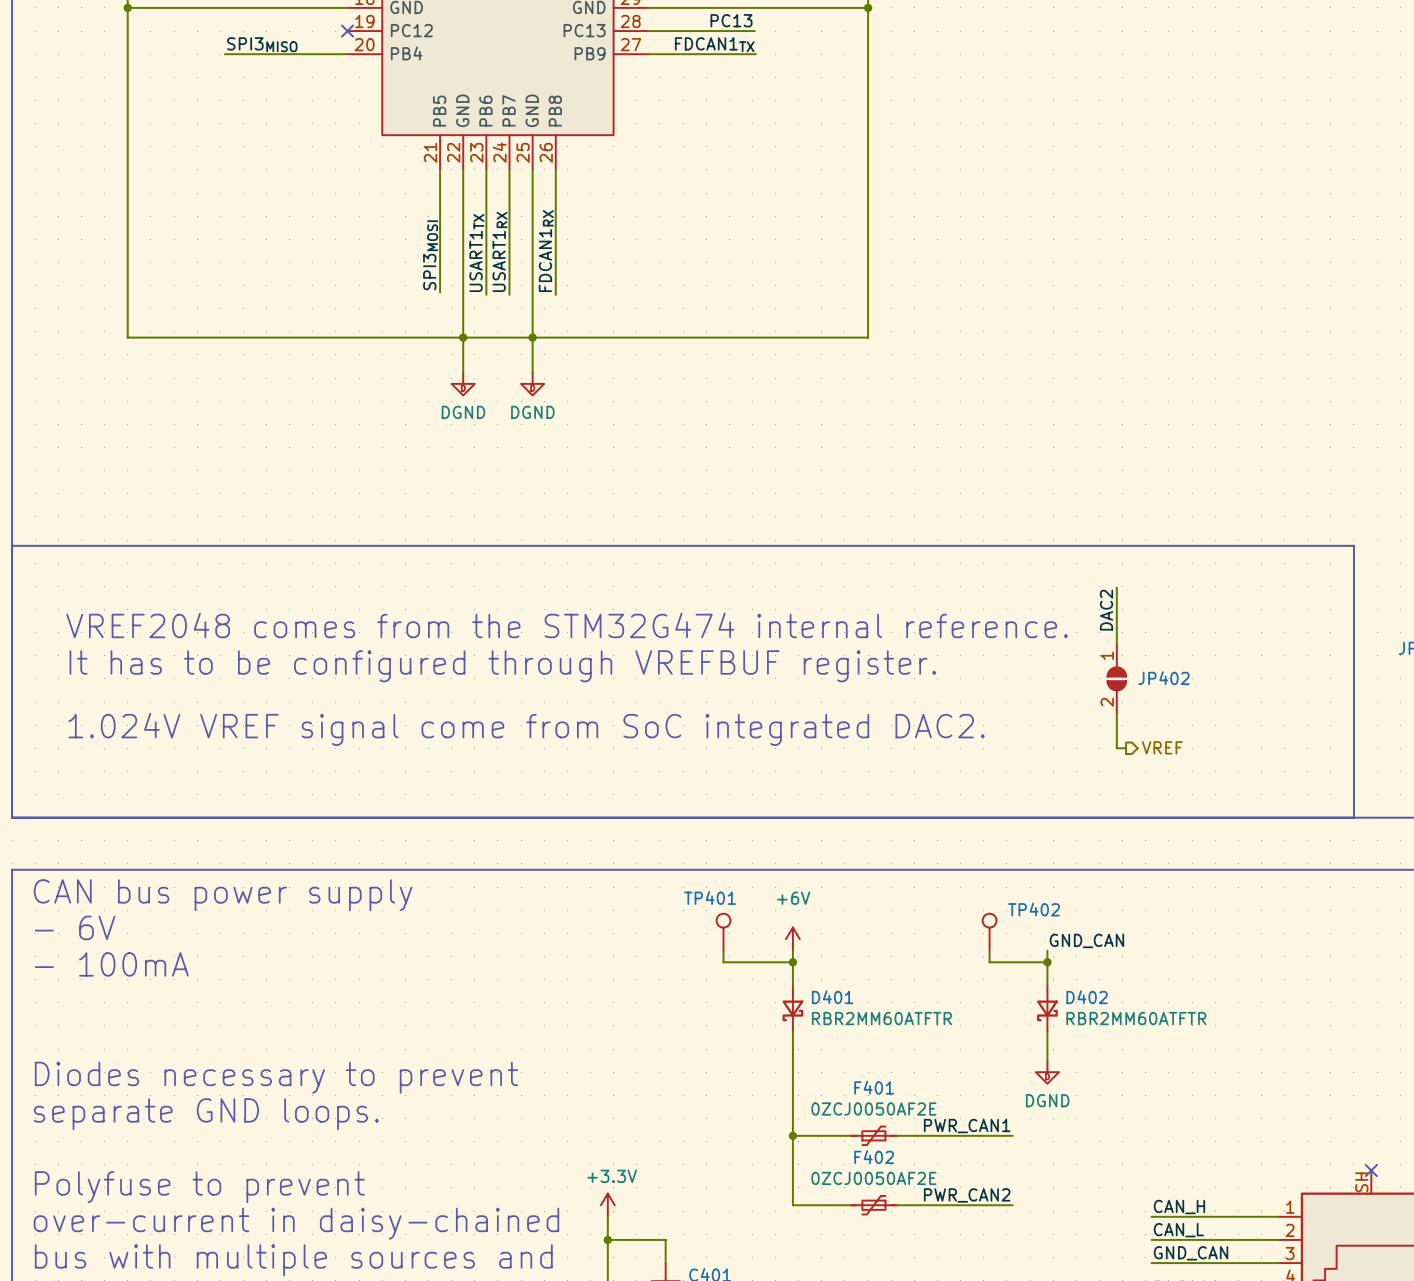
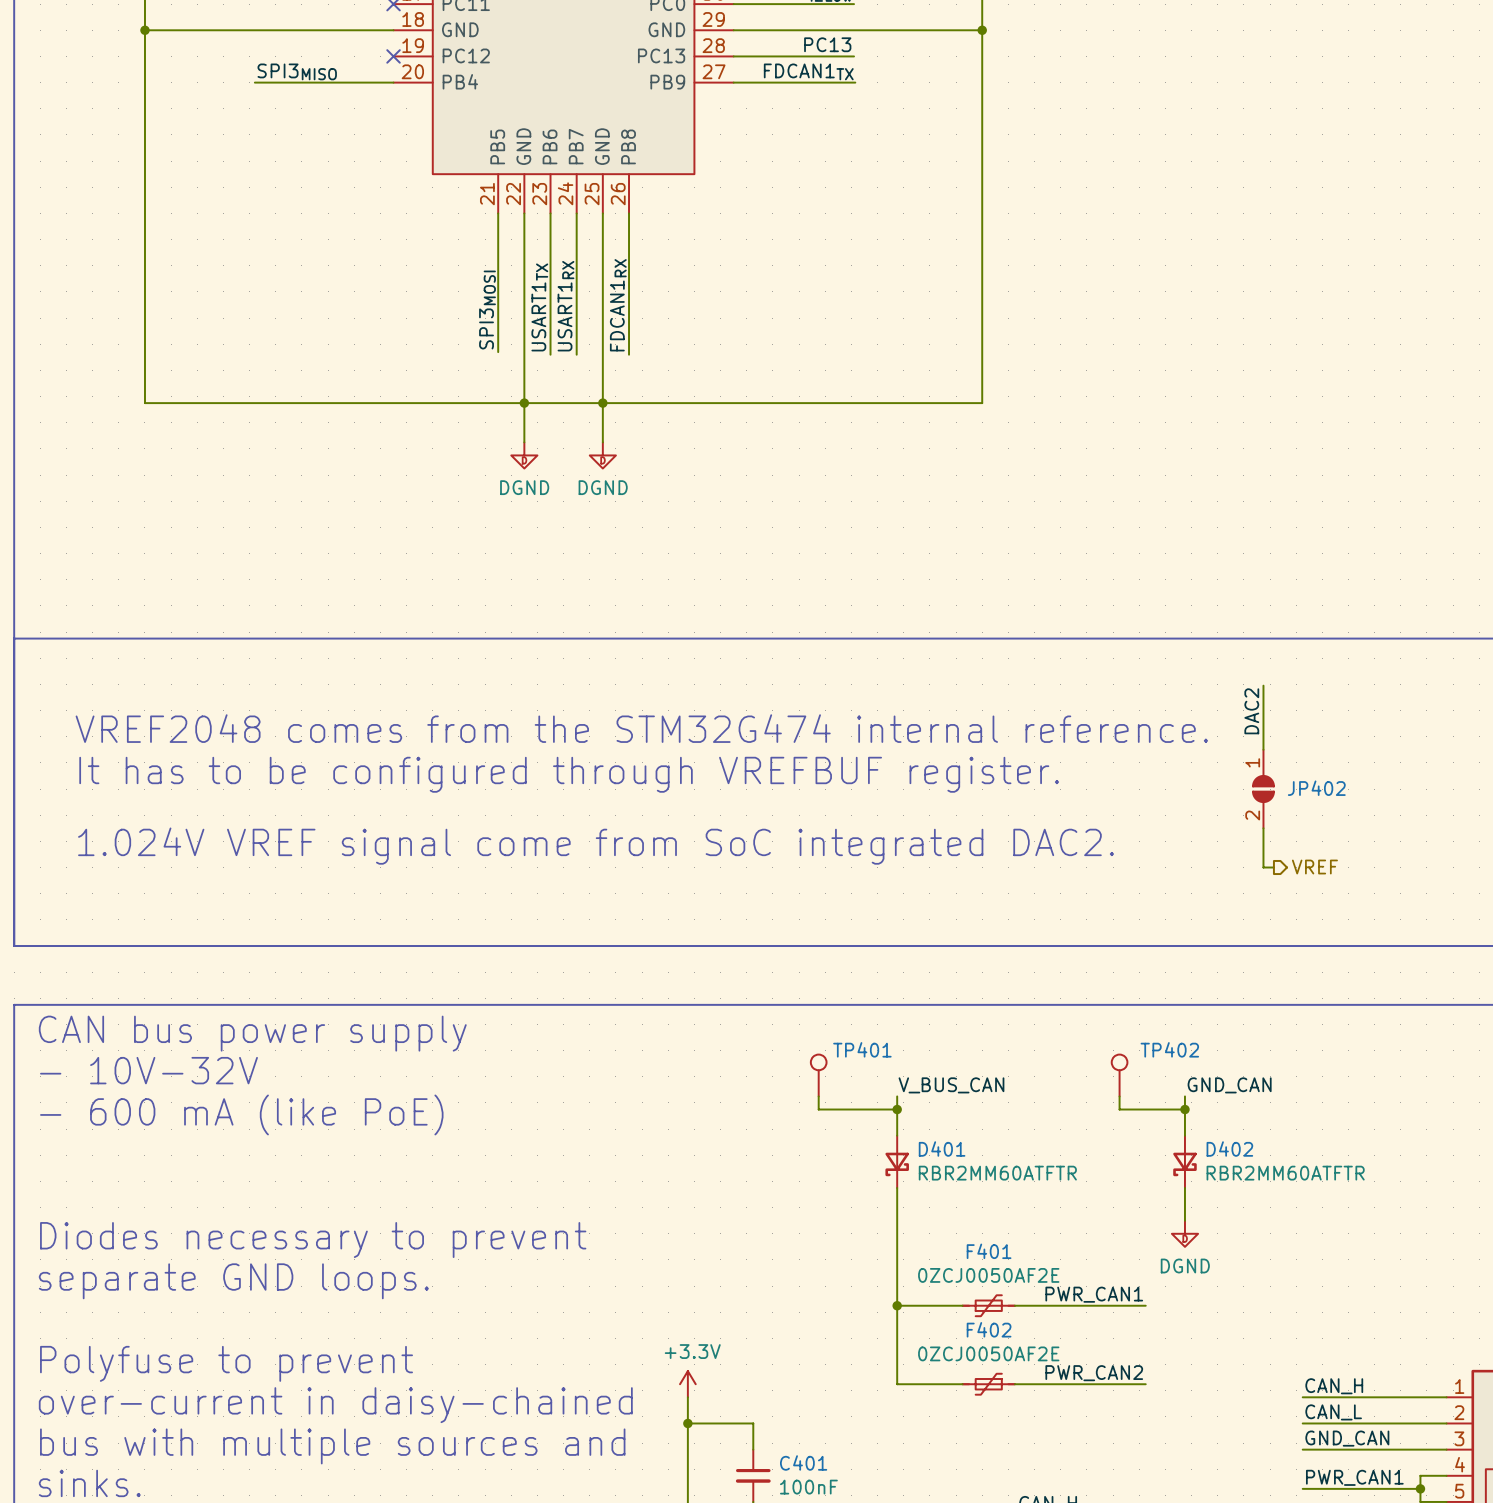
TP401 name position: TP401 (710, 897) -> TP401 (862, 1049)
text: - 6V (75, 927) -> - 10V-32V (148, 1070)
power symbol: +6V (792, 939) -> none
label: none -> V_BUS_CAN (951, 1085)
text: - 100mA (111, 964) -> - 600 mA (like PoE) (241, 1114)

